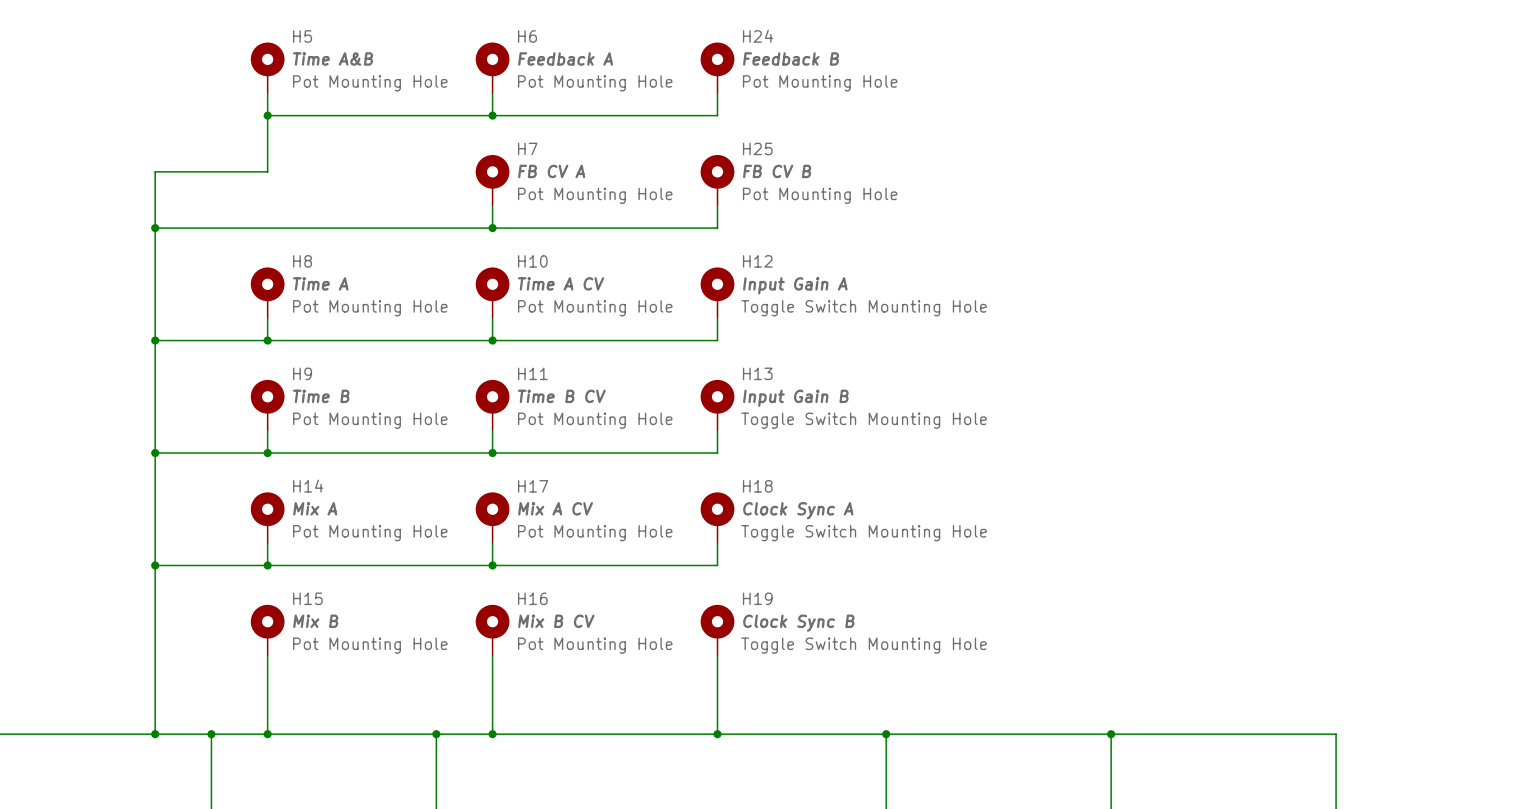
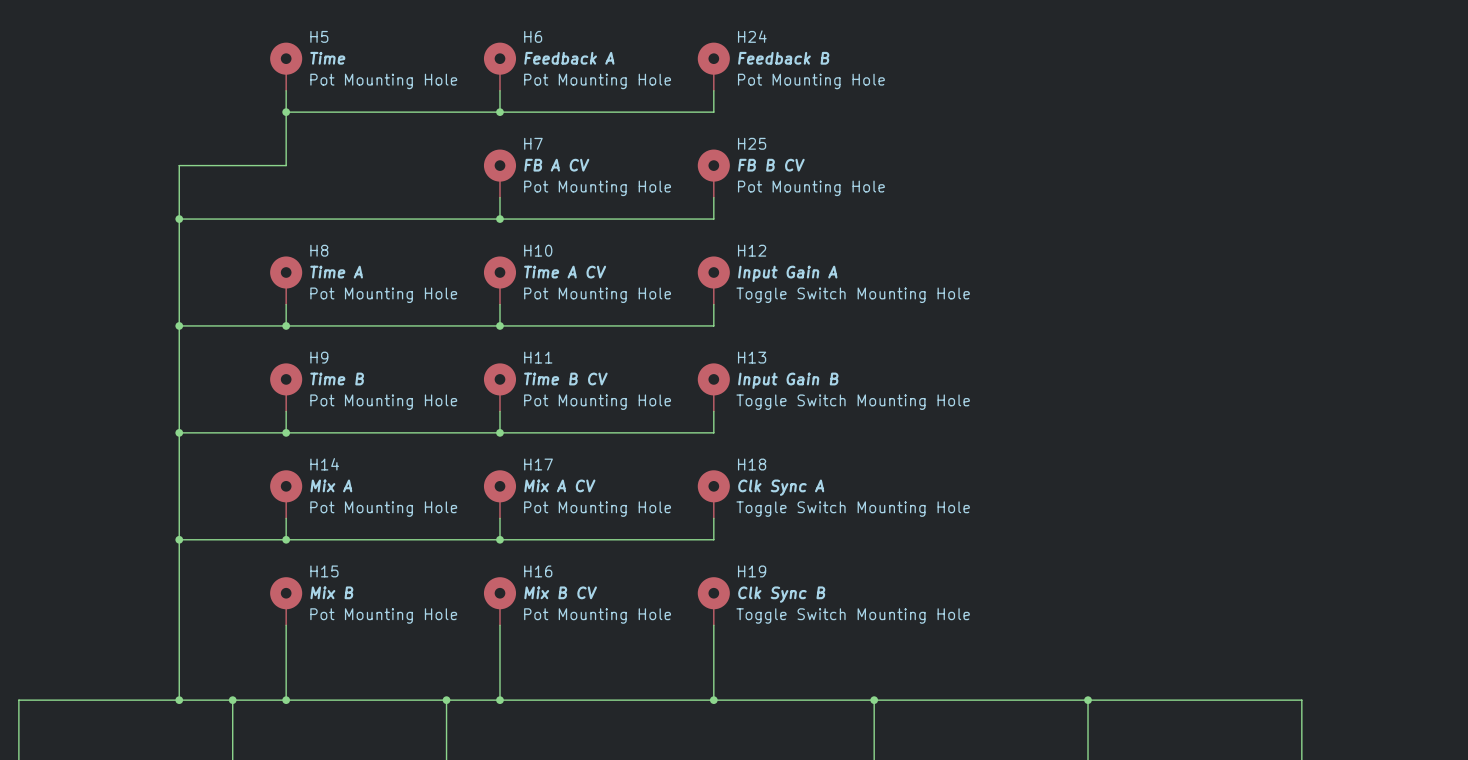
H5 value: Time A&B (333, 58) -> Time (327, 58)
H7 value: FB CV A (551, 171) -> FB A CV (556, 165)
H25 value: FB CV B (777, 171) -> FB B CV (771, 165)
H18 value: Clock Sync A (798, 510) -> Clk Sync A (781, 487)
H19 value: Clock Sync B (798, 623) -> Clk Sync B (781, 594)

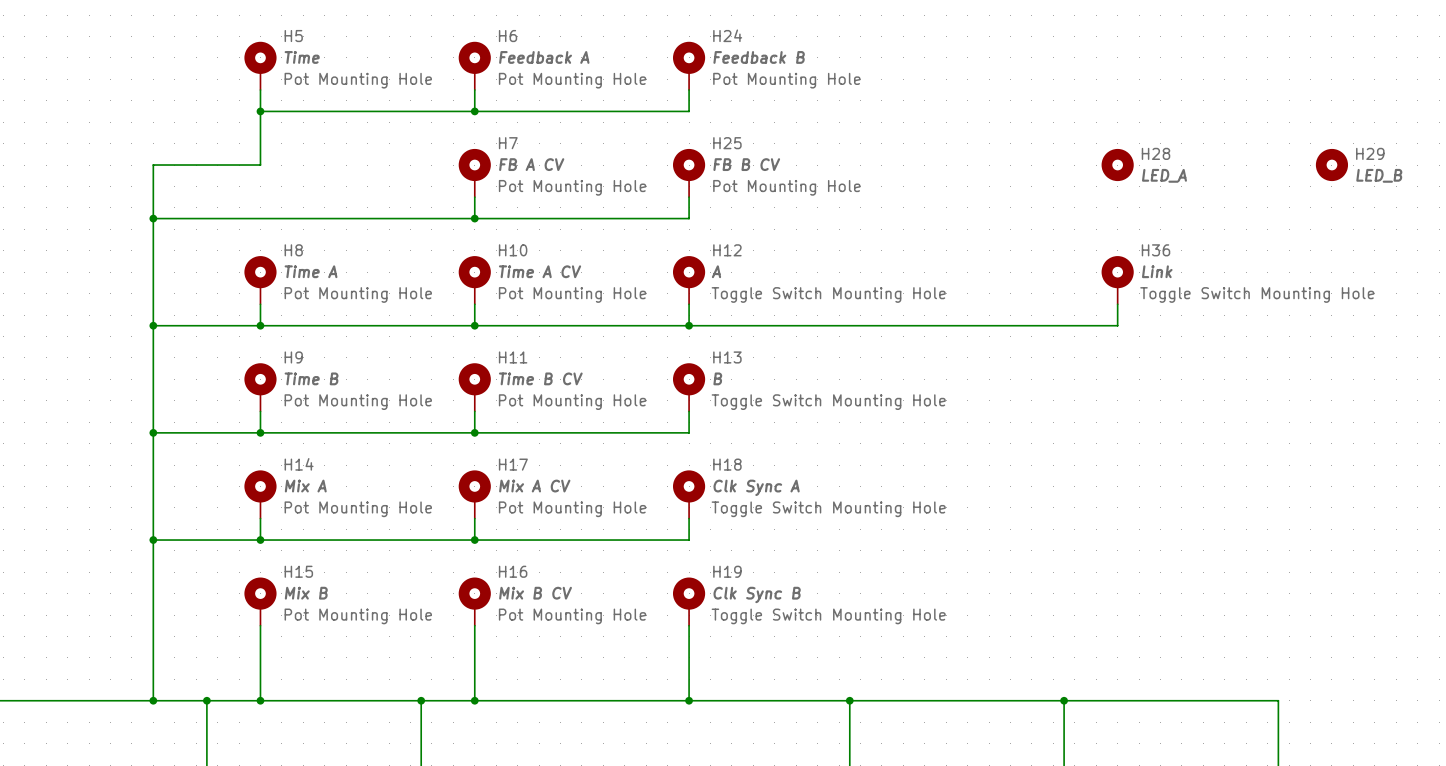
H28: none -> LED_A (1117, 165)
H29: none -> LED_B (1331, 165)
H12 value: Input Gain A (787, 273) -> A (716, 271)
H36: none -> Link (1117, 280)
wire: none -> (1117, 304) (1117, 325) (689, 325)
junction: none -> (689, 325)
H13 value: Input Gain B (788, 380) -> B (717, 378)

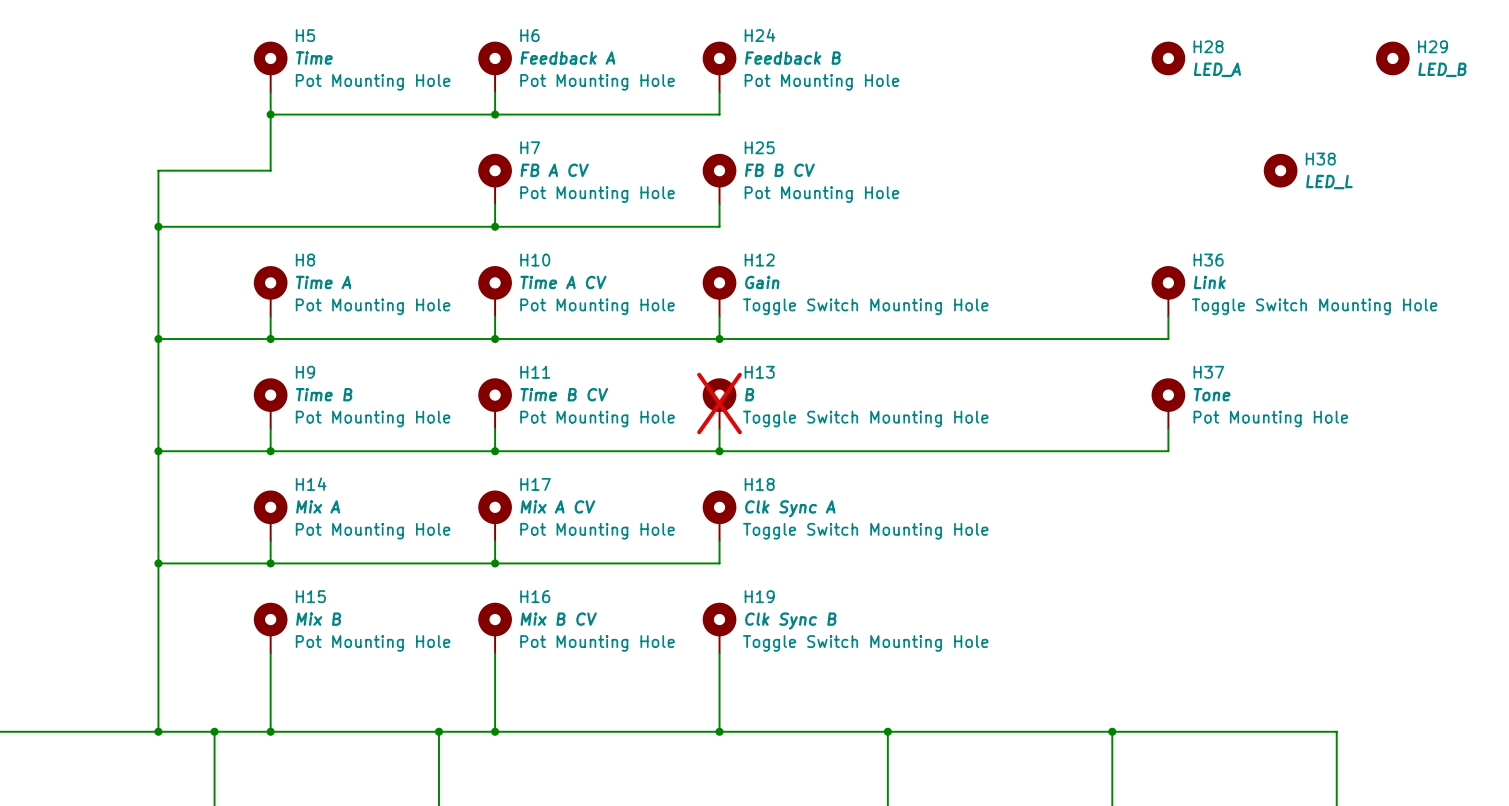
H28 position: (1117, 165) -> (1168, 58)
H38: none -> LED_L (1280, 170)
H29 position: (1331, 165) -> (1392, 58)
H12 value: A (716, 271) -> Gain (762, 282)
H13 do-not-place cross: none -> (719, 403)
H37: none -> Tone (1168, 403)
wire: none -> (1168, 428) (1168, 451) (719, 451)
junction: none -> (719, 451)

